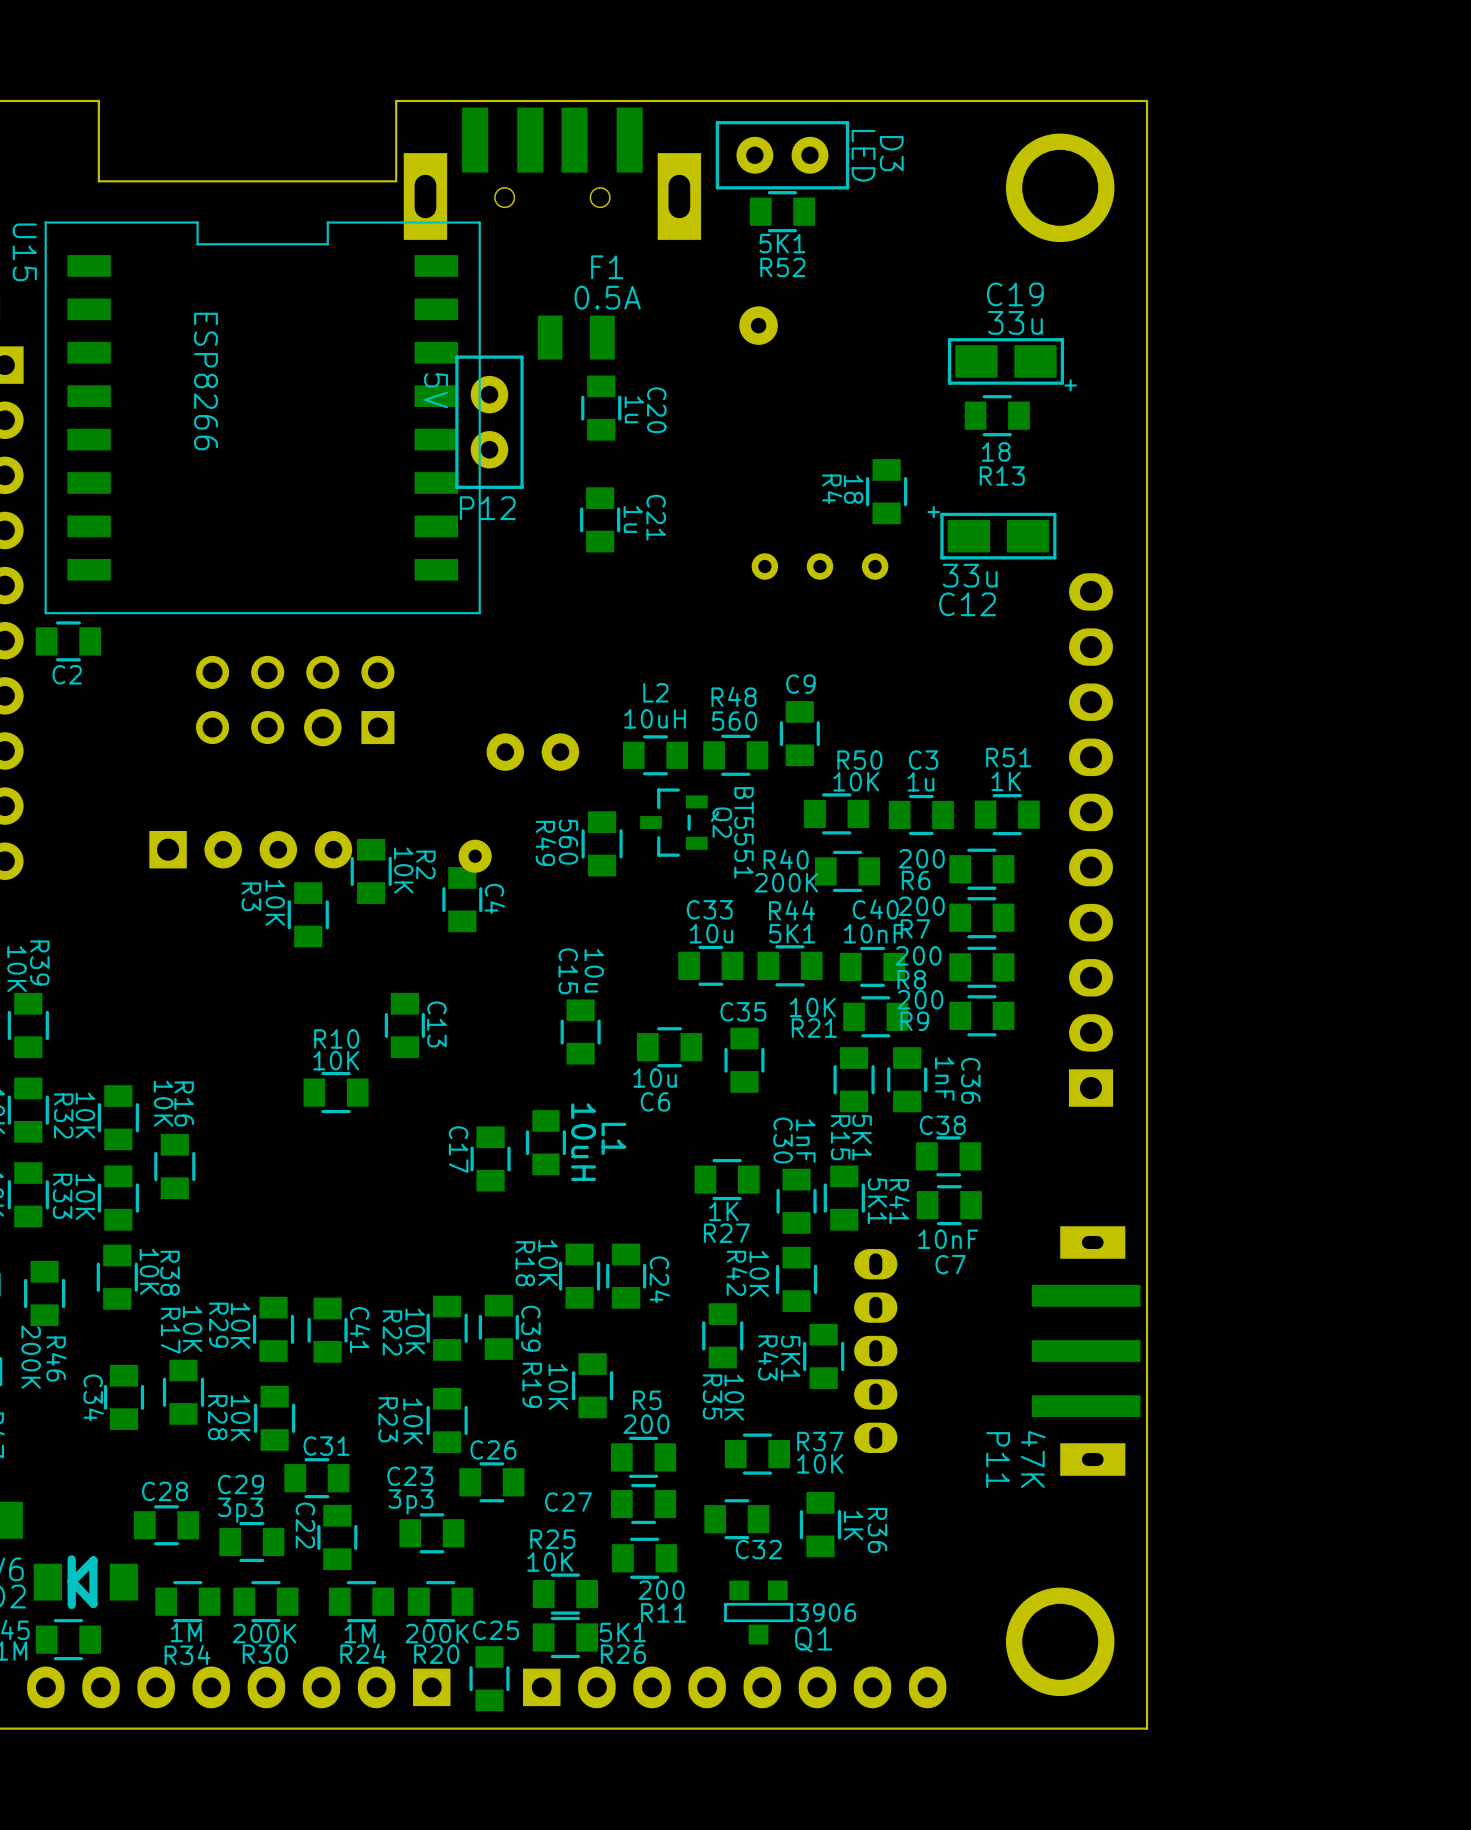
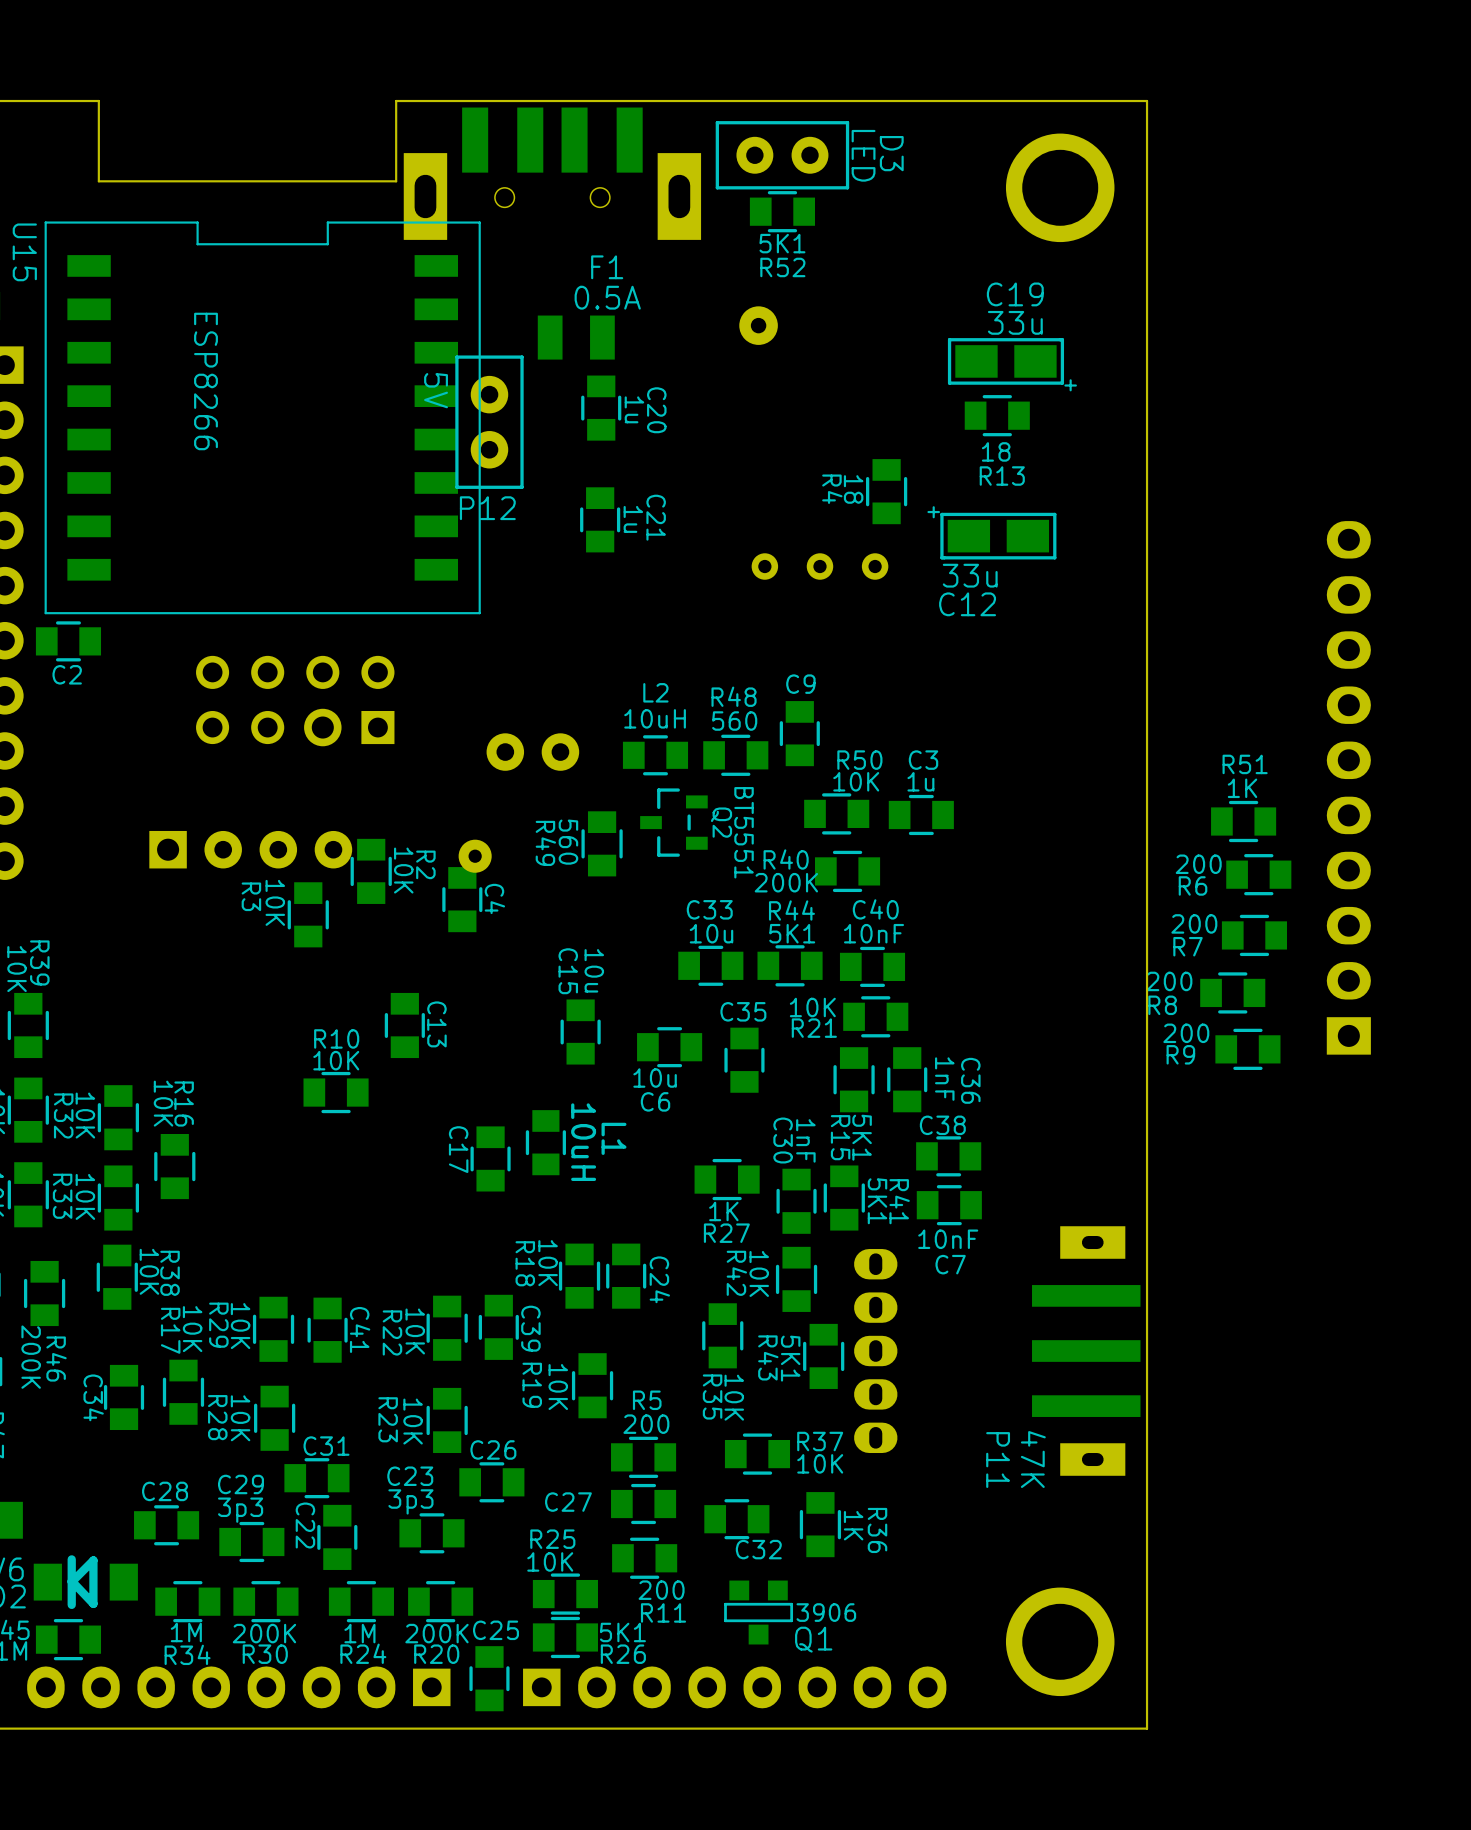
R51 position: (1007, 814) -> (1243, 821)
part position: (1091, 839) -> (1348, 787)
R6 position: (981, 869) -> (1258, 874)
R7 position: (981, 917) -> (1254, 935)
R8 position: (981, 967) -> (1232, 992)
R9 position: (981, 1015) -> (1247, 1049)

